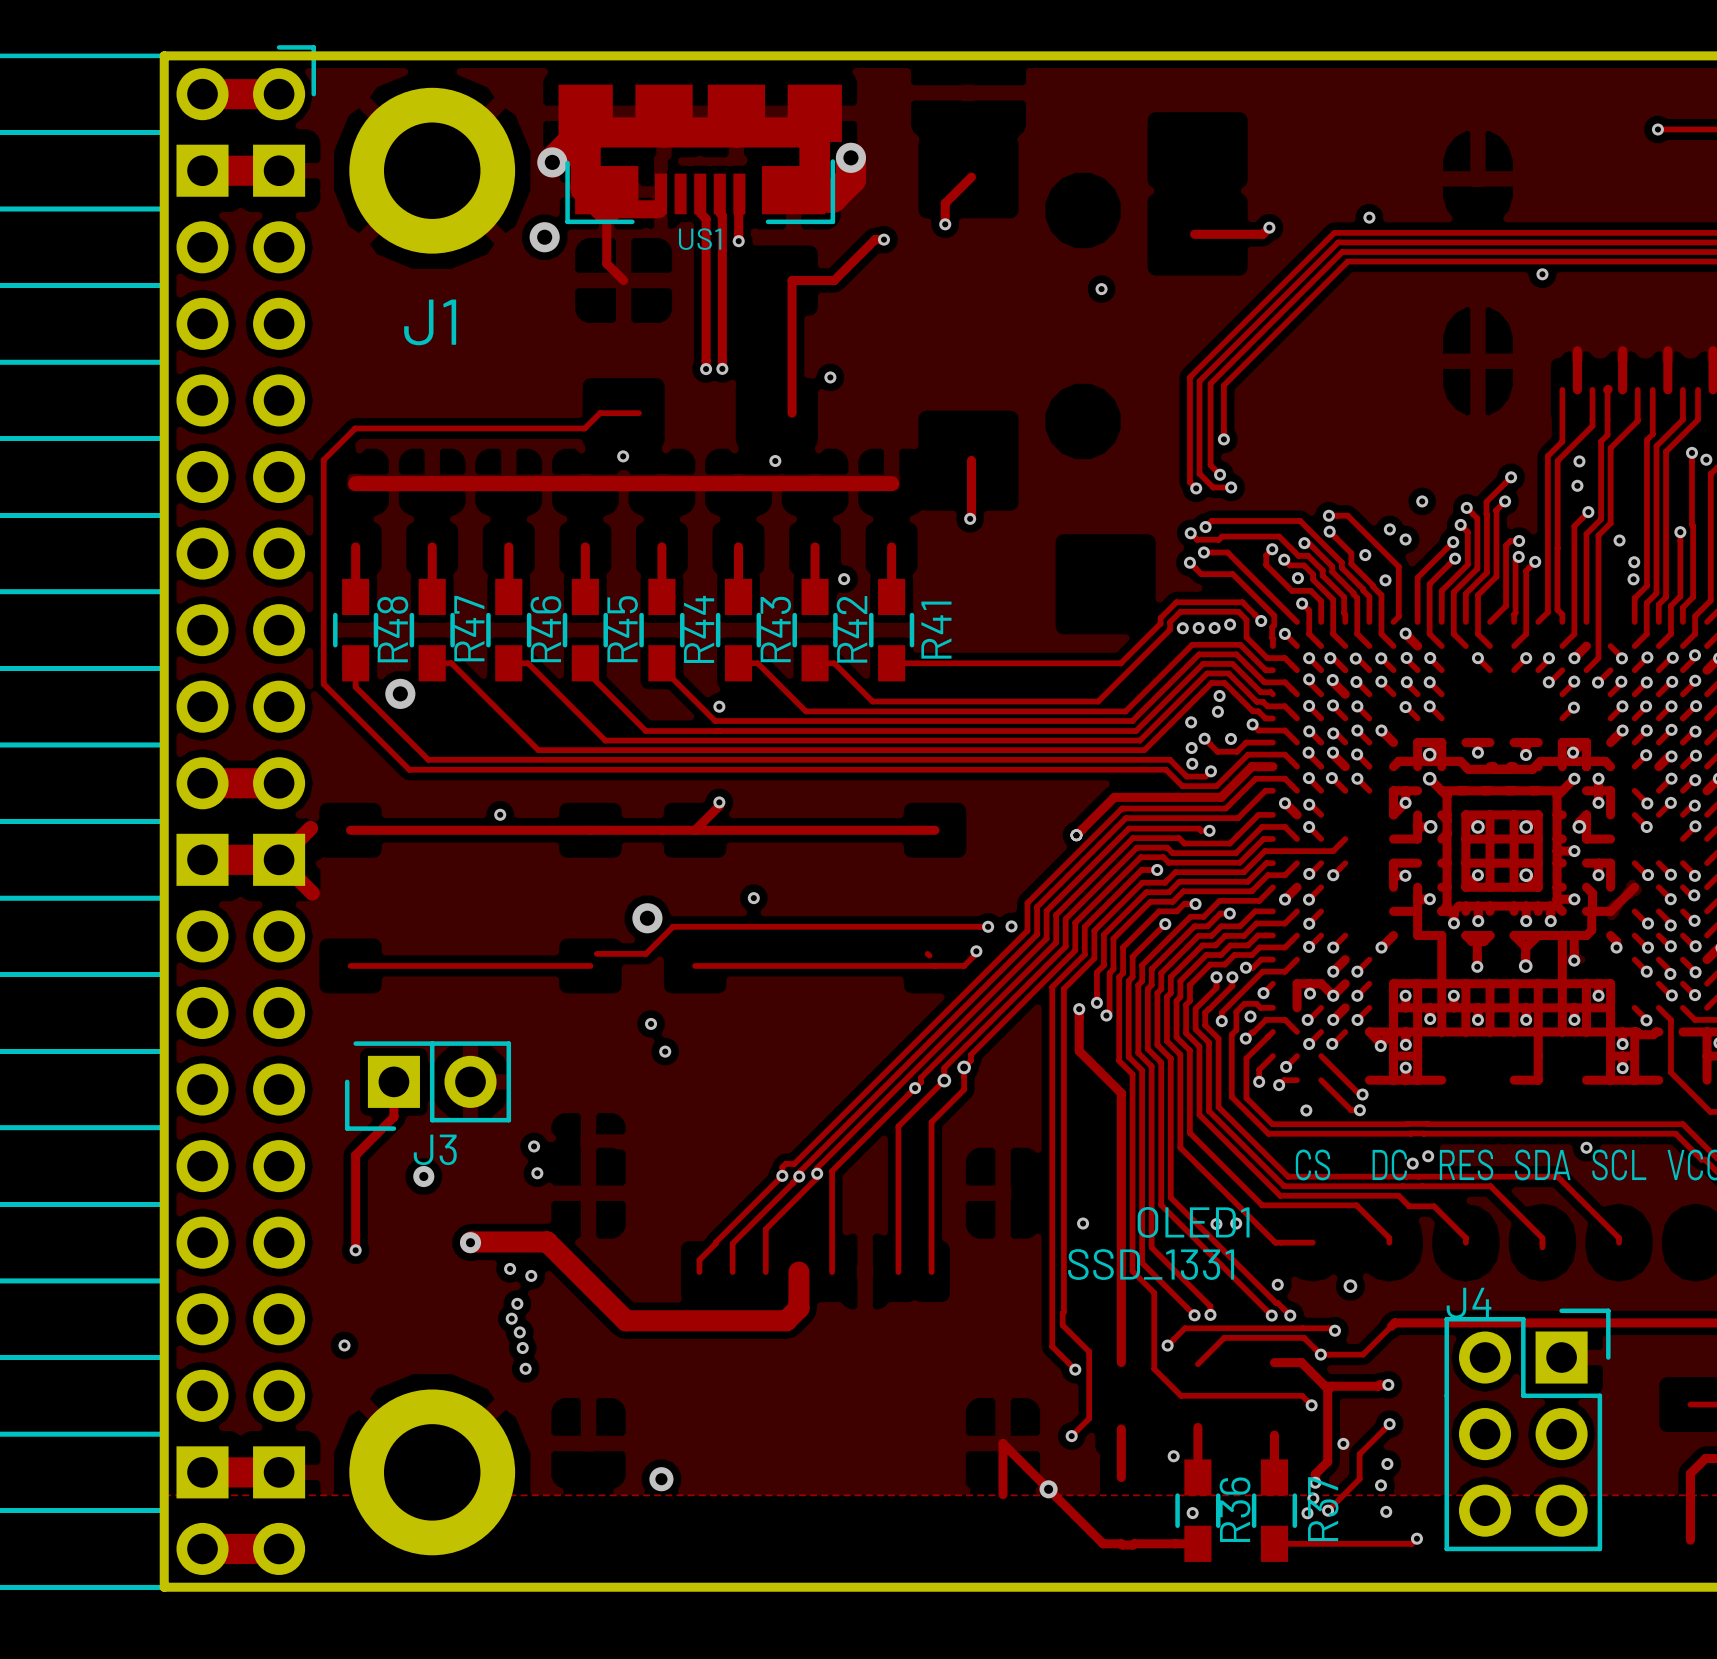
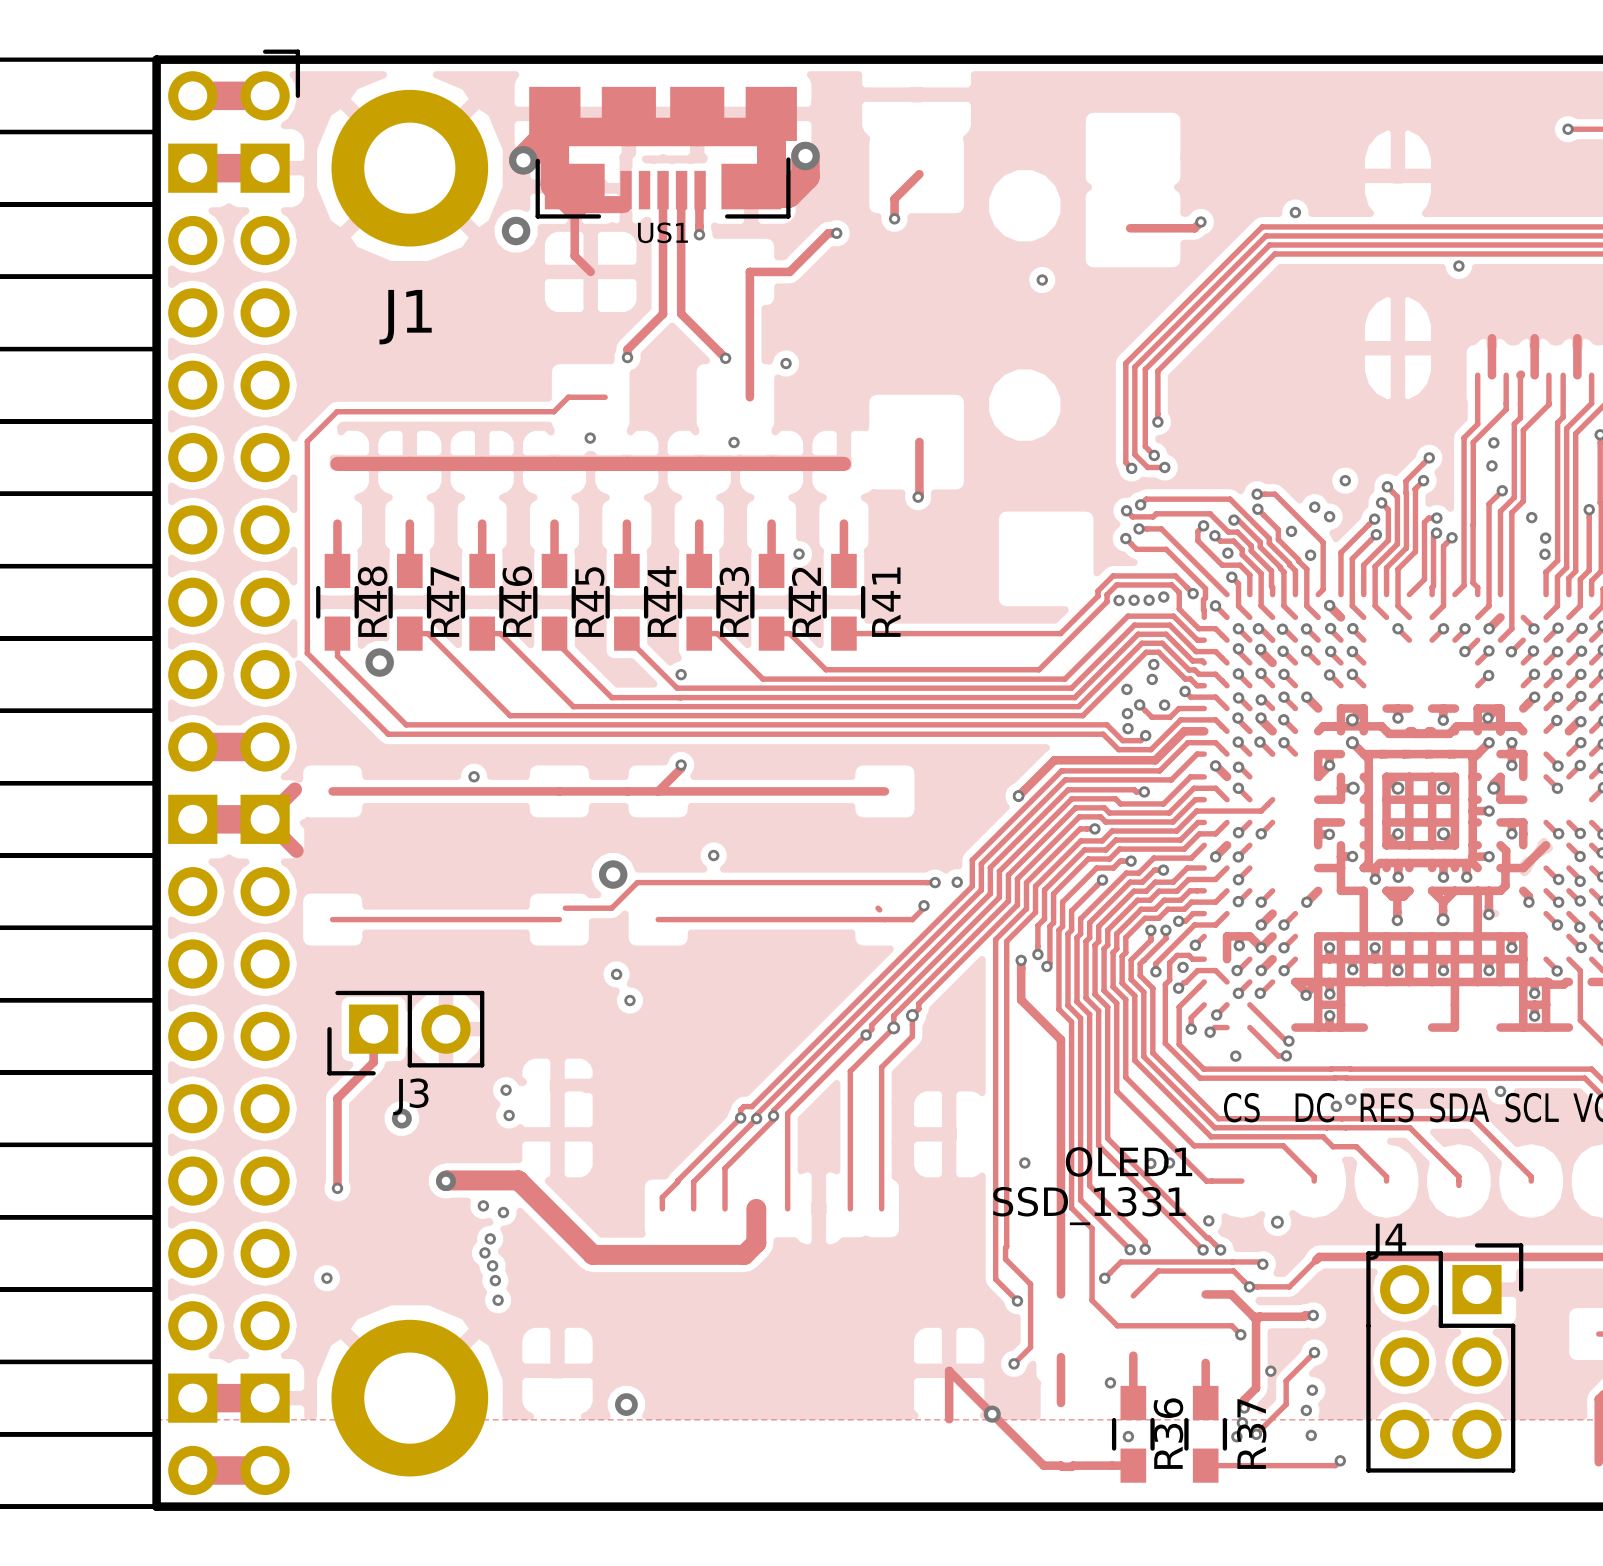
track: (700, 213) (706, 218) (706, 369) -> (663, 208) (663, 313) (627, 349) (627, 357)
track: (719, 213) (722, 215) (722, 368) -> (681, 208) (681, 313) (725, 358)
via: (722, 368) -> none
via: (706, 369) -> none
via: none -> (627, 357)
via: none -> (725, 358)

